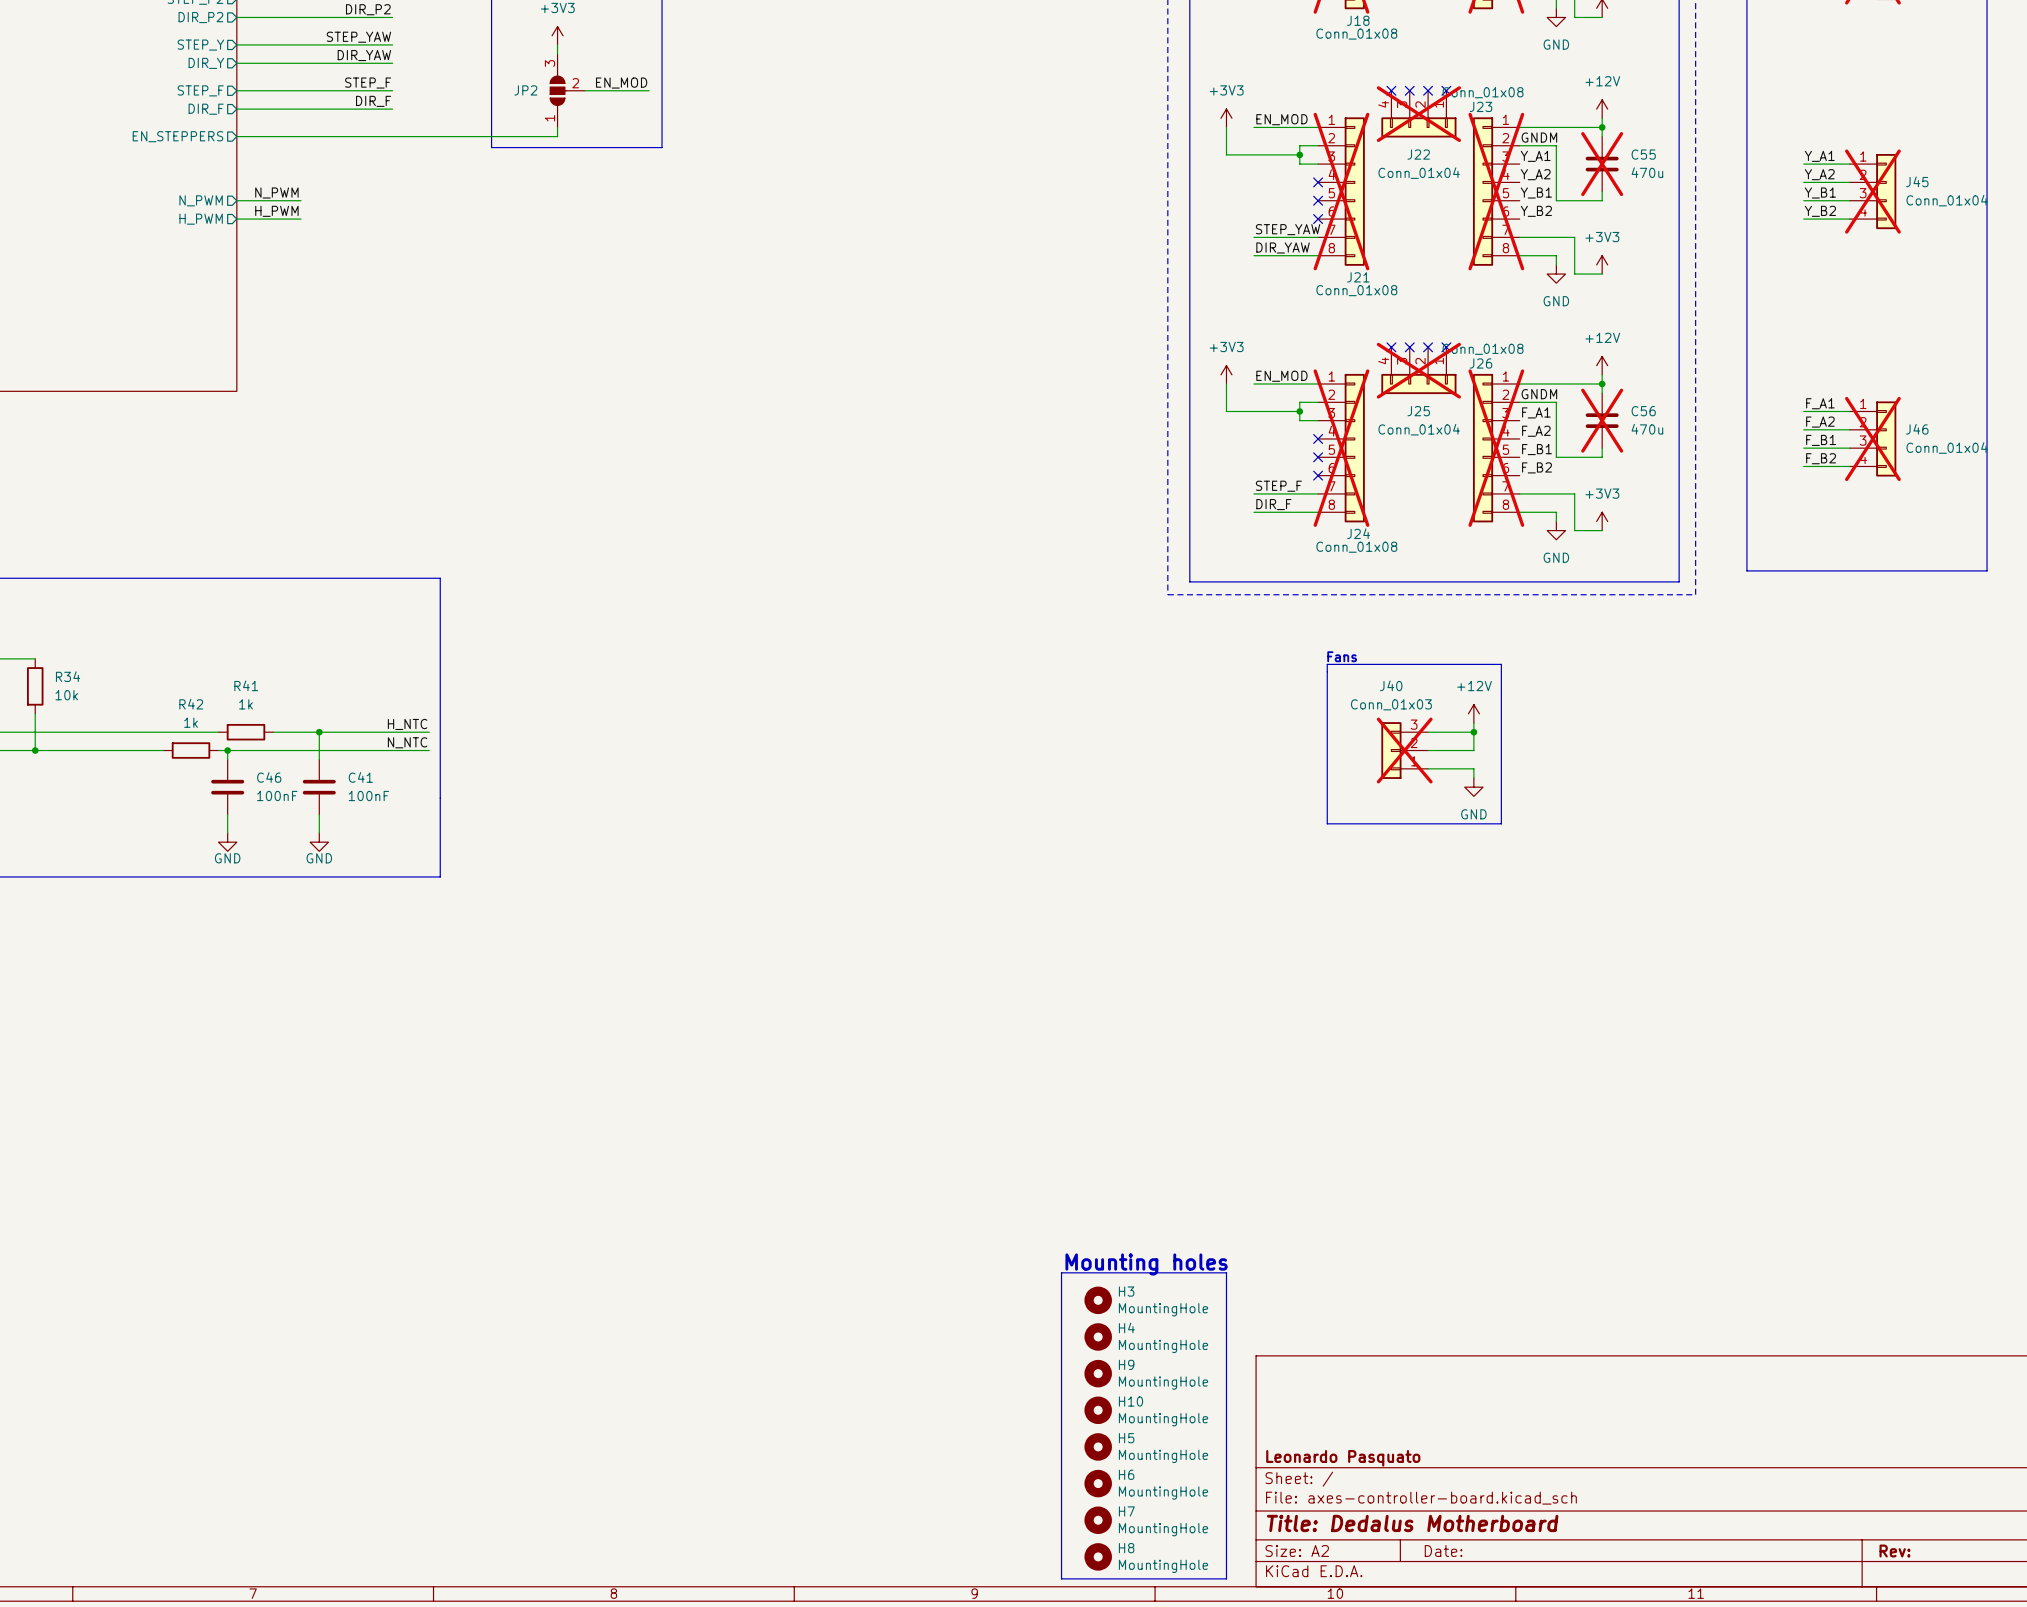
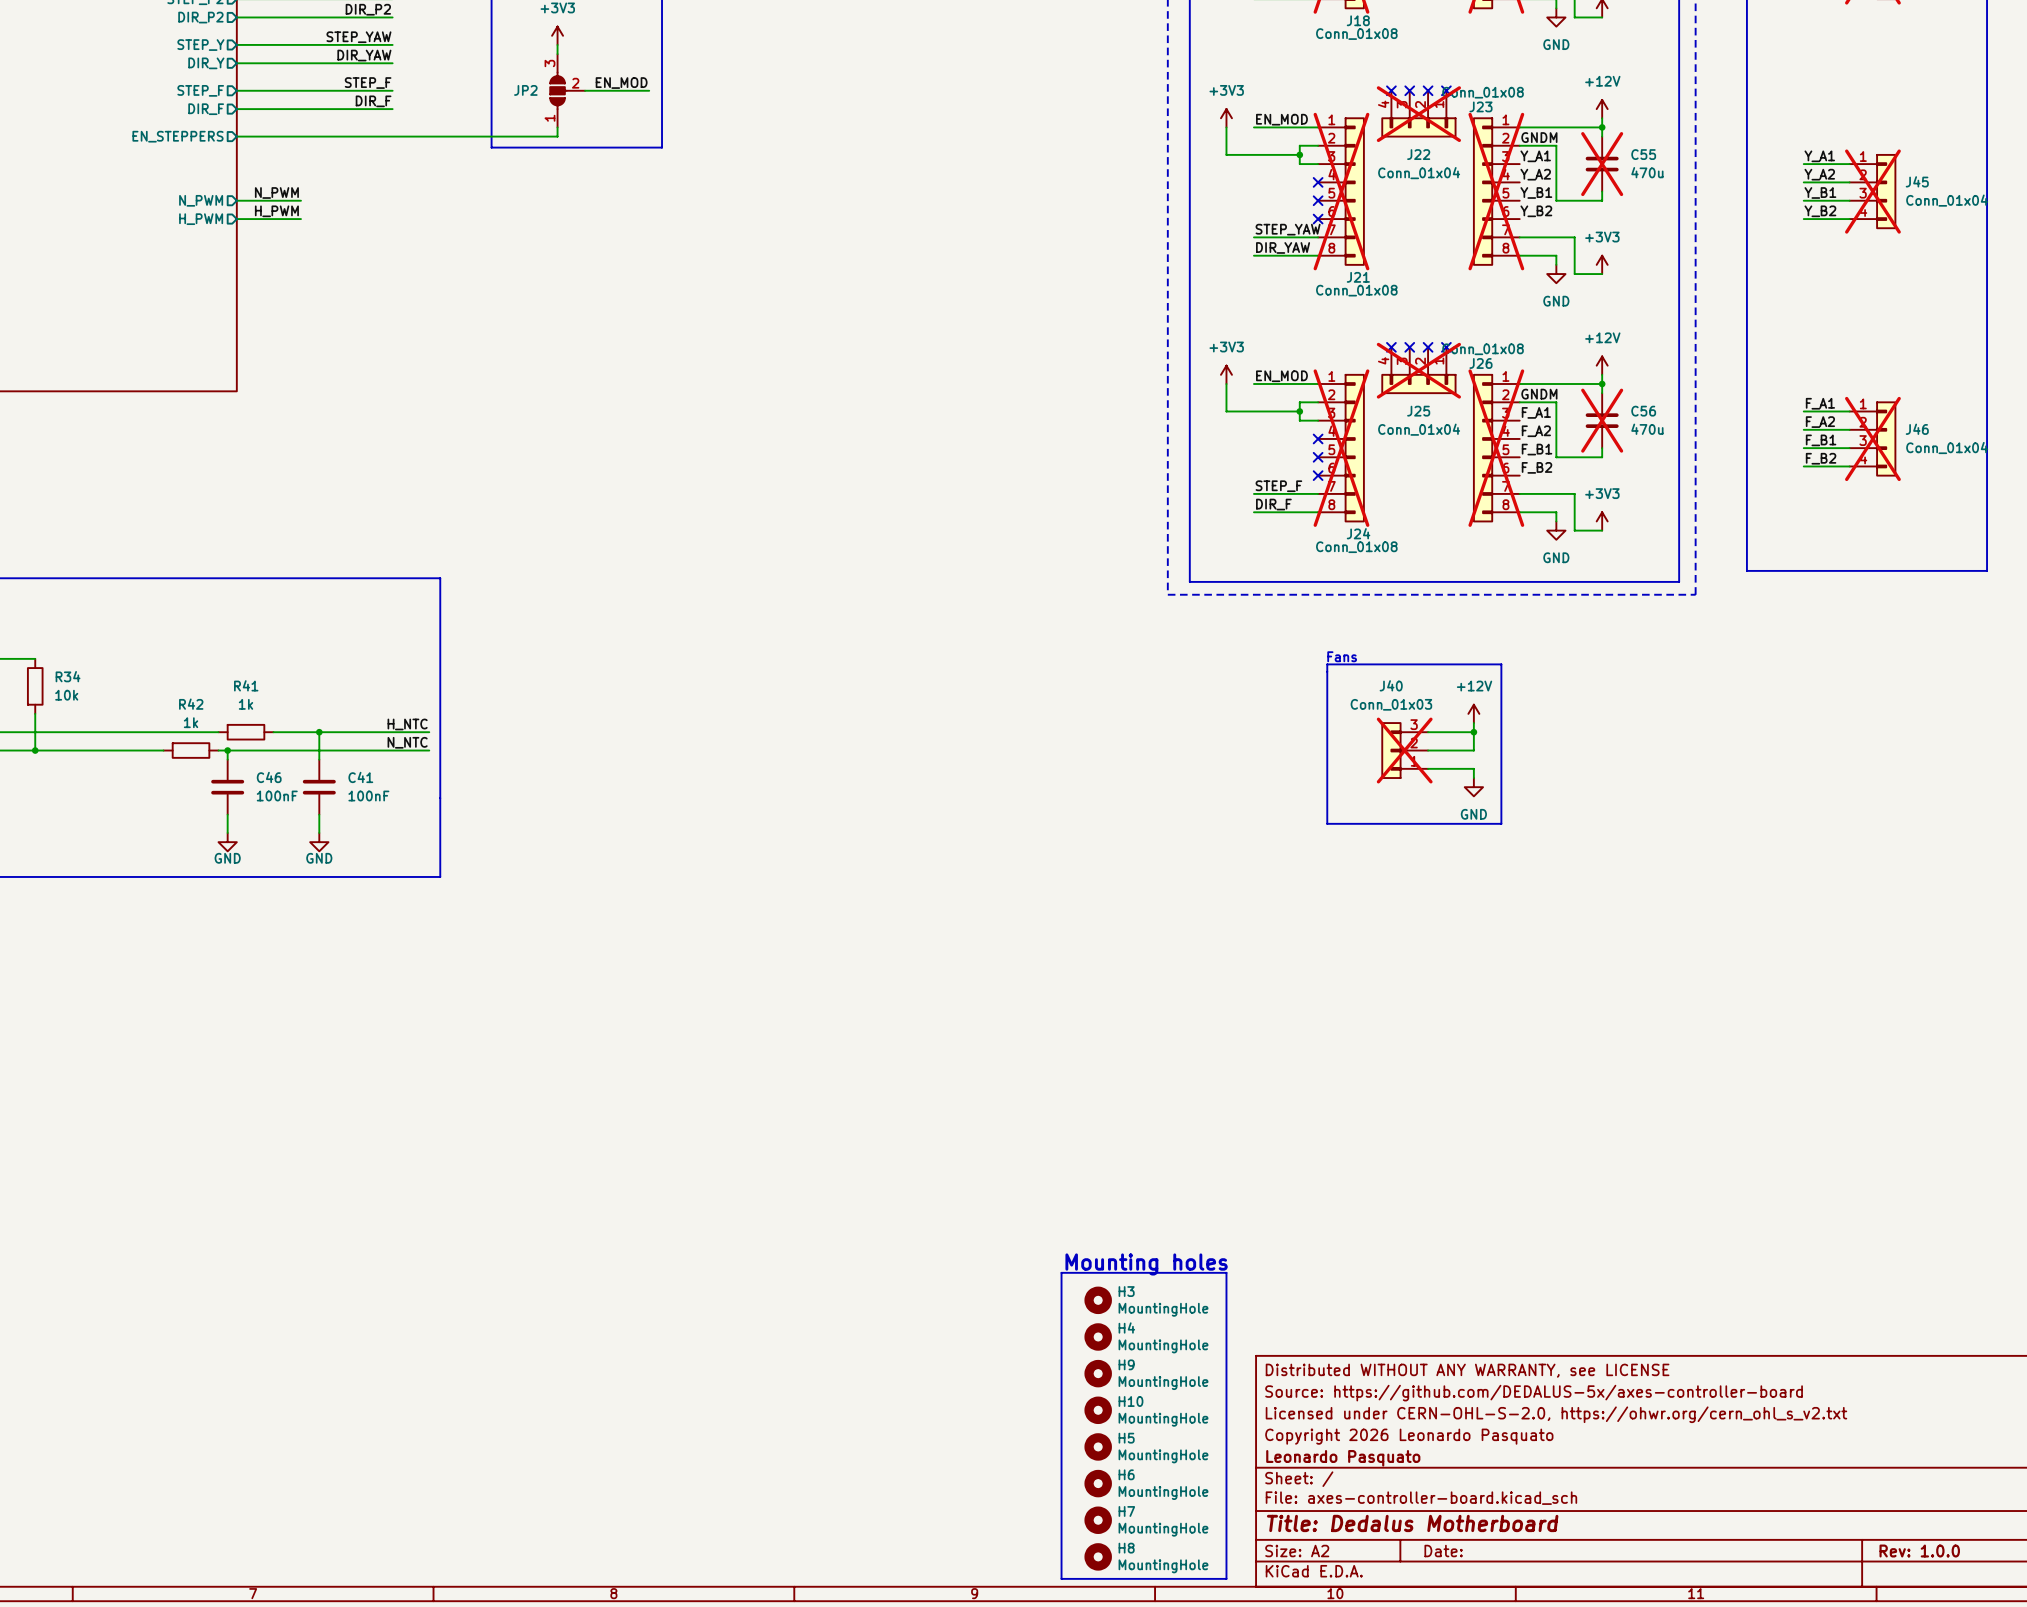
title block: none -> Distributed WITHOUT ANY WARRANTY, see LICENSE (1467, 1370)
title block: none -> Source: https://github.com/DEDALUS-5x/axes-controller-board (1534, 1393)
title block: none -> Licensed under CERN-OHL-S-2.0, https://ohwr.org/cern_ohl_s_v2.txt (1556, 1414)
title block: none -> Copyright 2026 Leonardo Pasquato (1409, 1436)
title block: Rev: (1894, 1551) -> Rev: 1.0.0 (1919, 1551)

